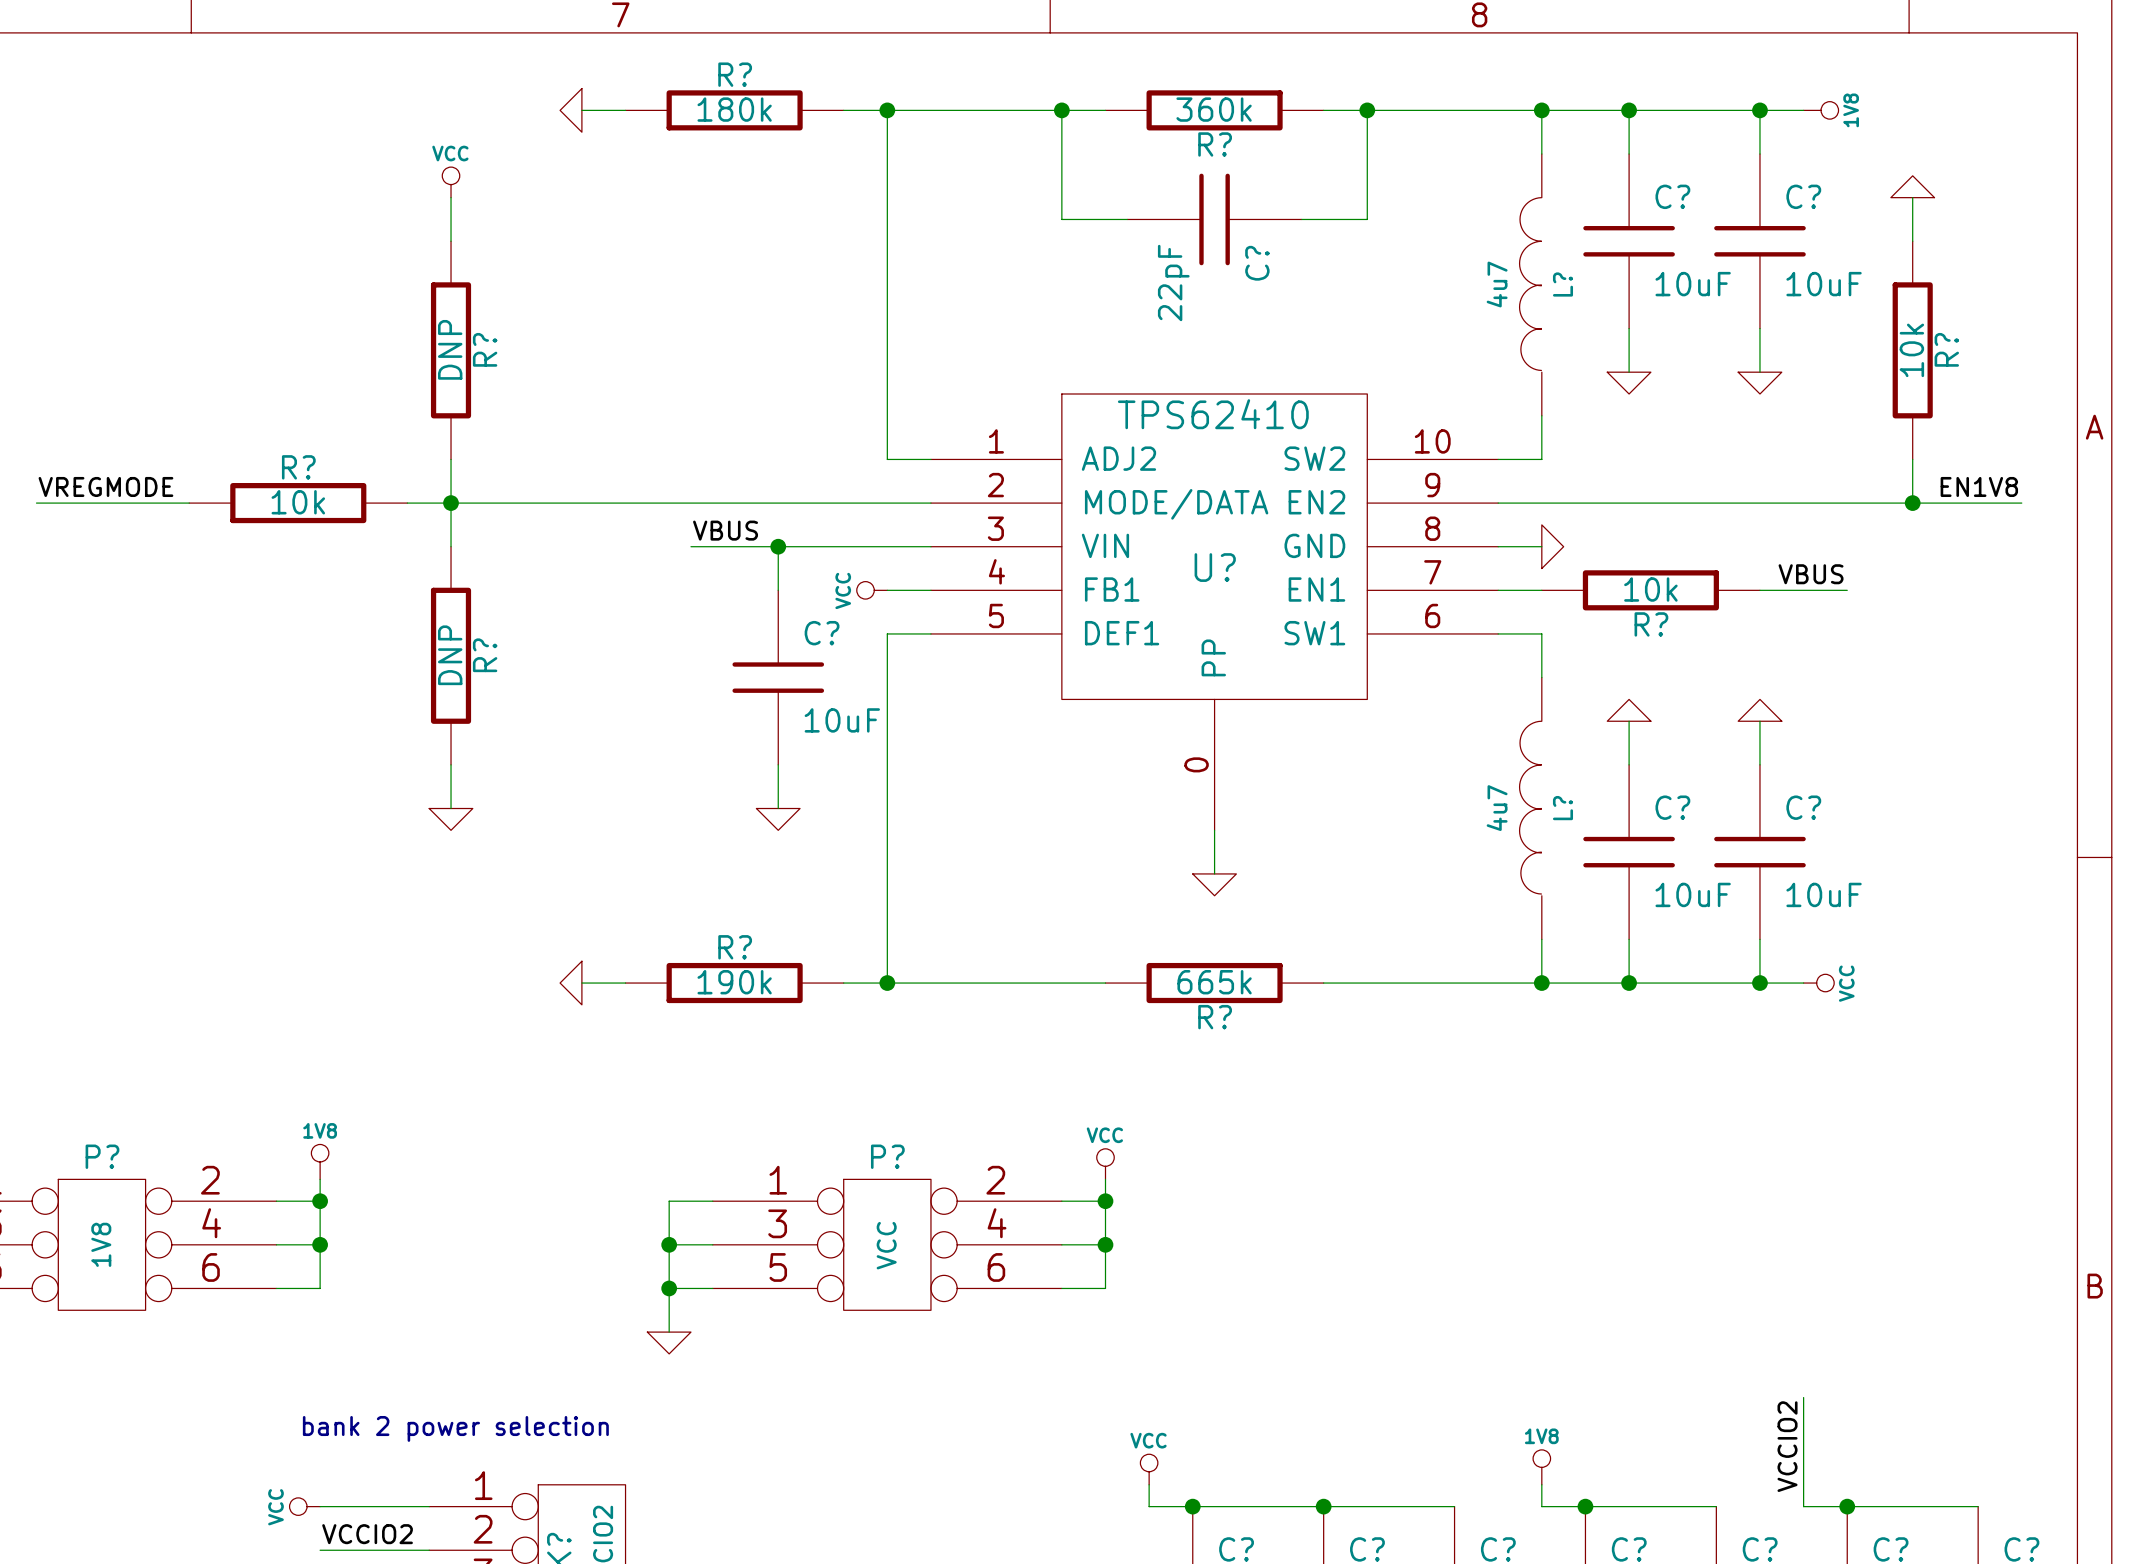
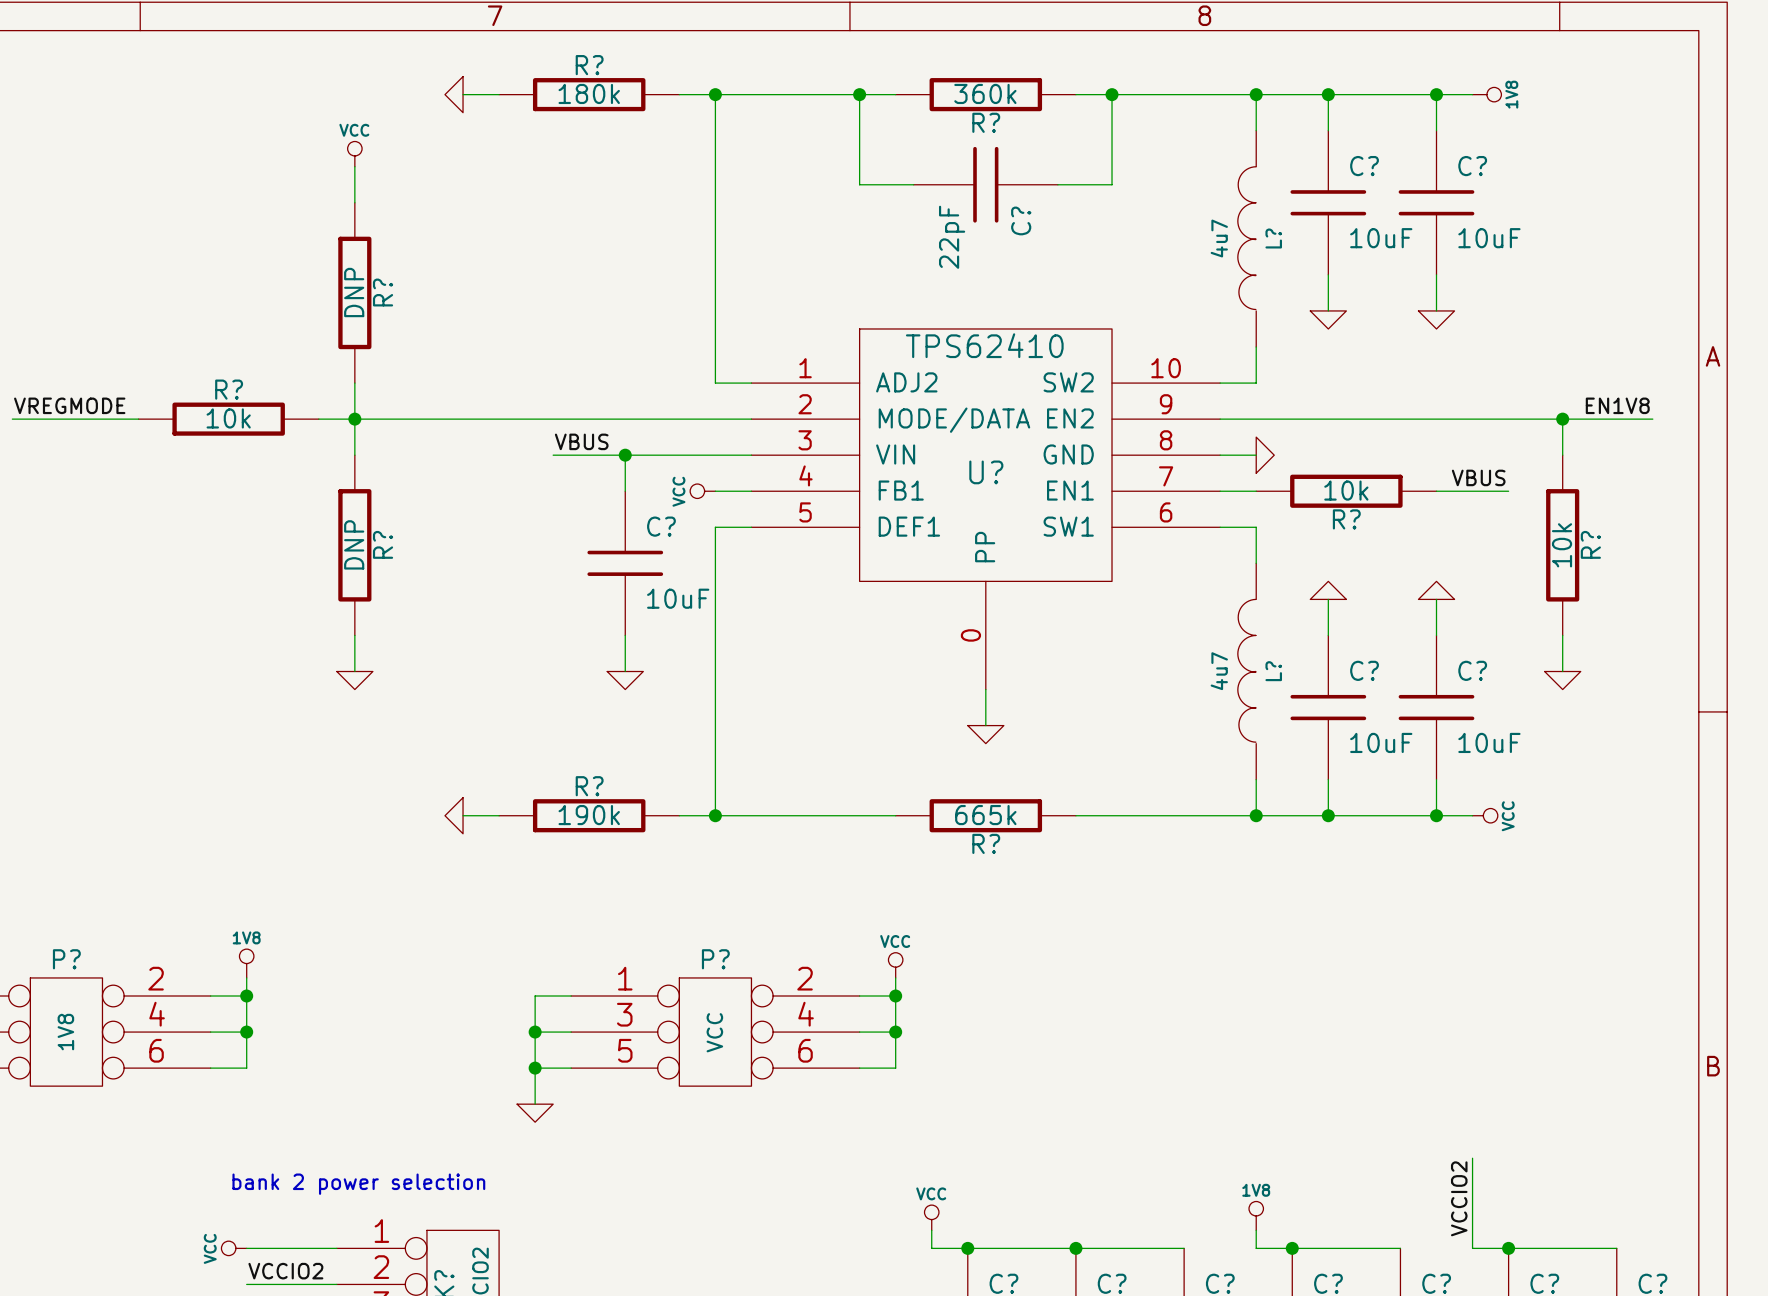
power symbol: (1912, 186) -> none
wire: (1912, 197) (1912, 241) -> none
R? position: (1912, 350) -> (1562, 545)
wire: (1912, 459) (1912, 503) -> (1562, 455) (1562, 419)
wire: none -> (1562, 635) (1562, 671)
power symbol: none -> (1562, 680)

